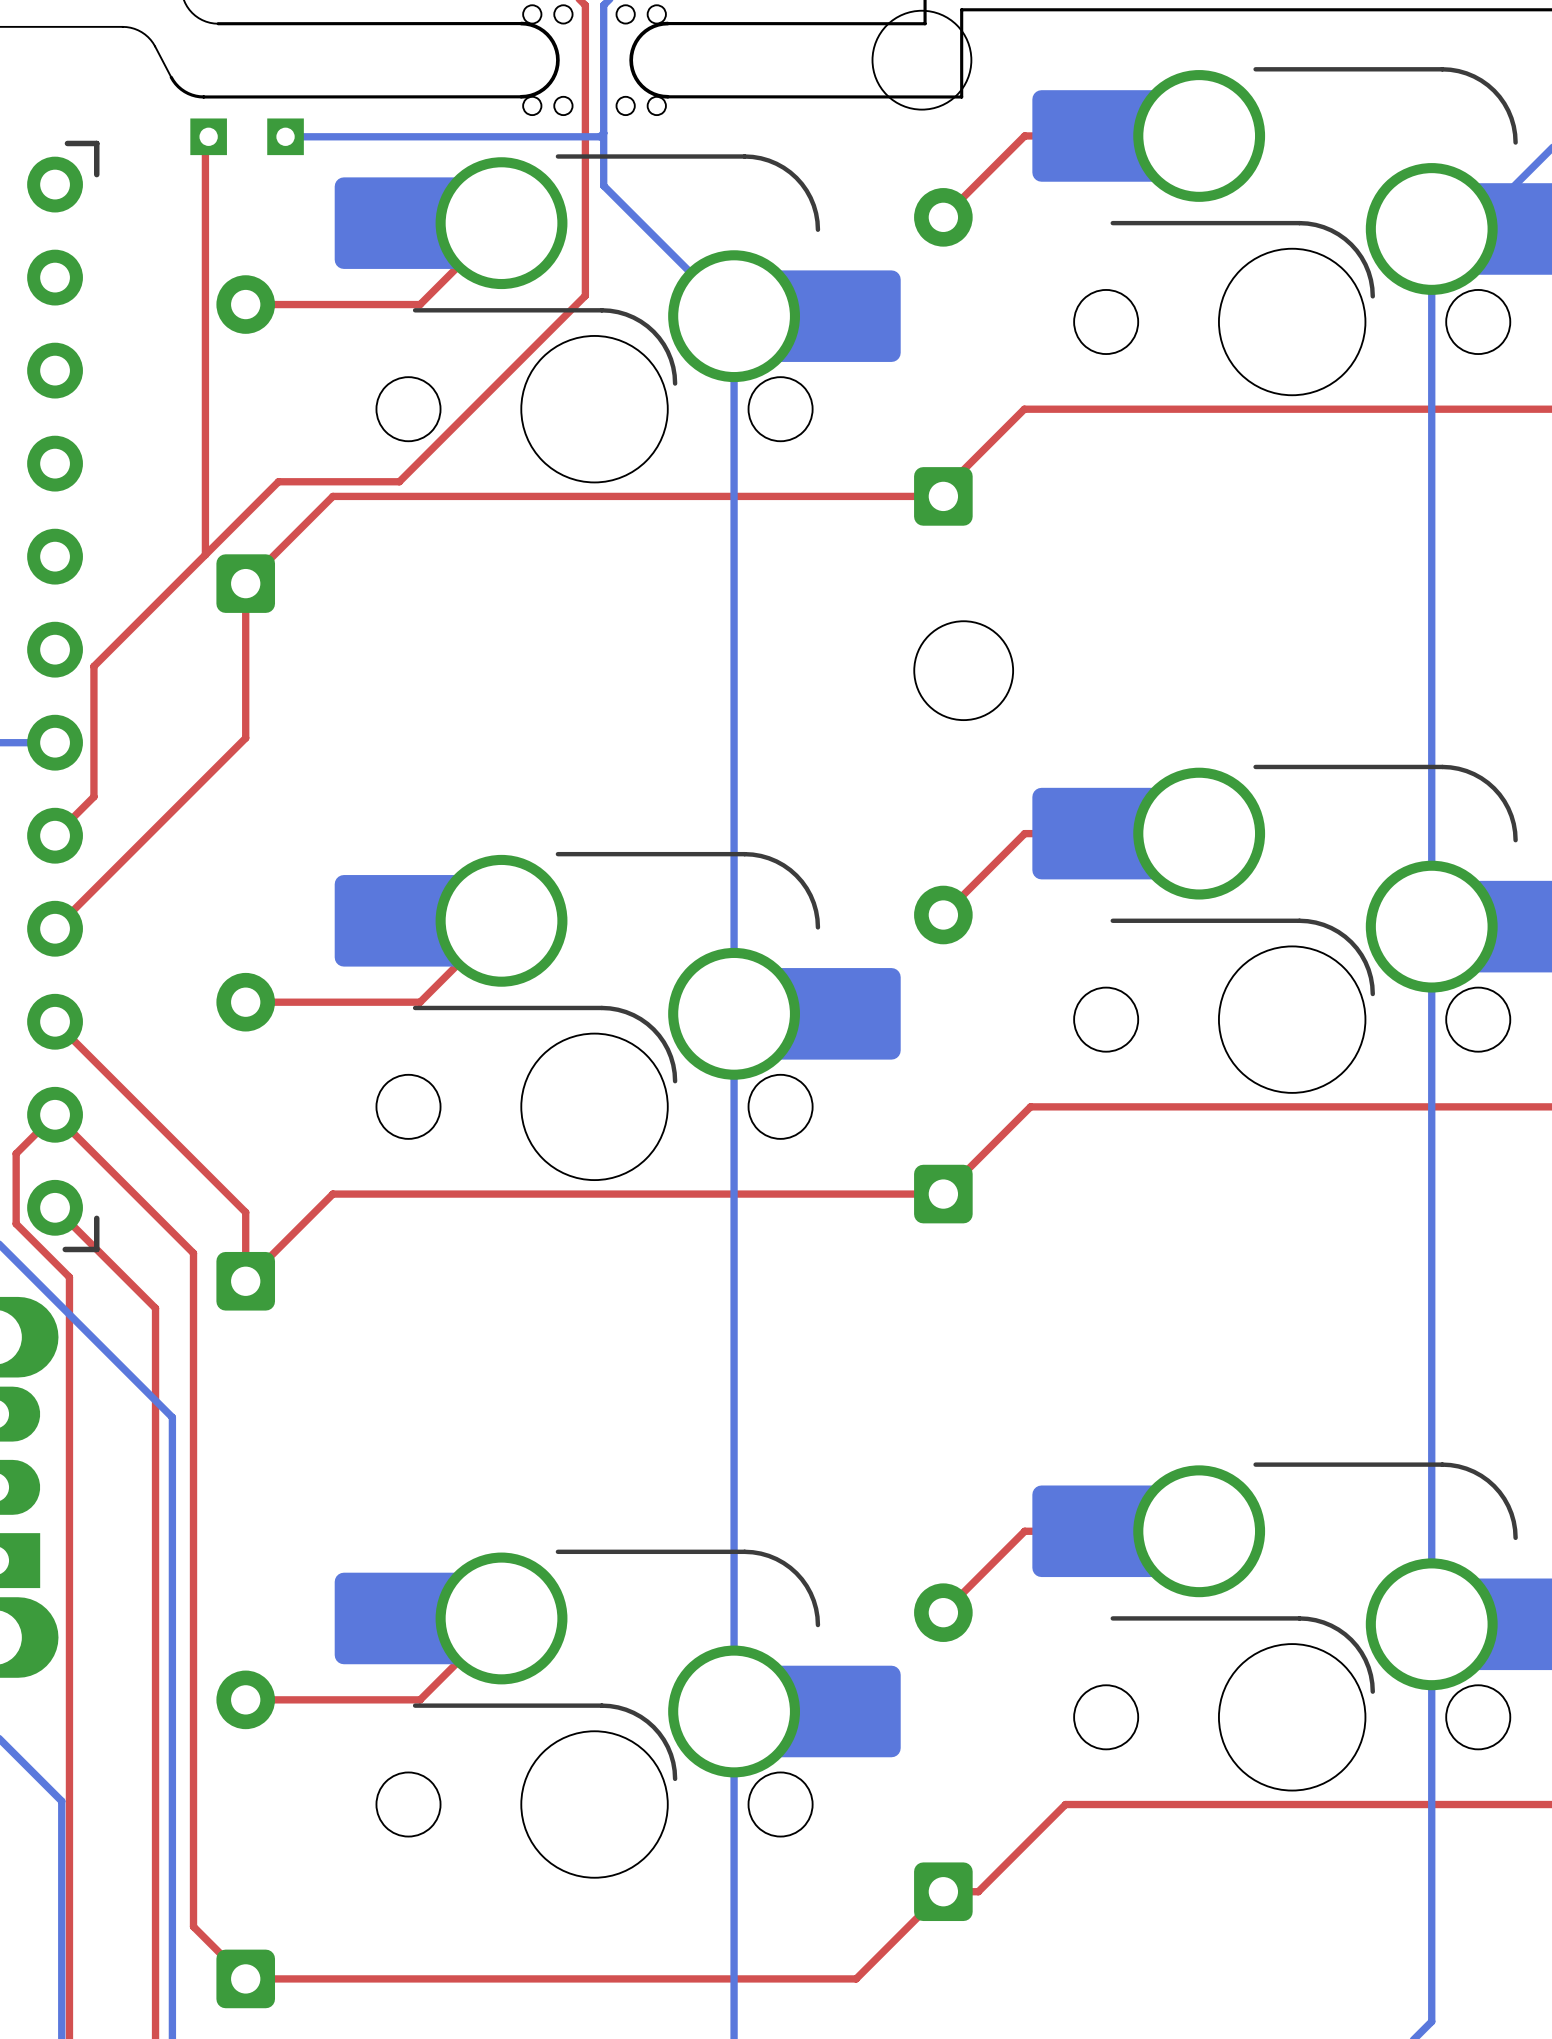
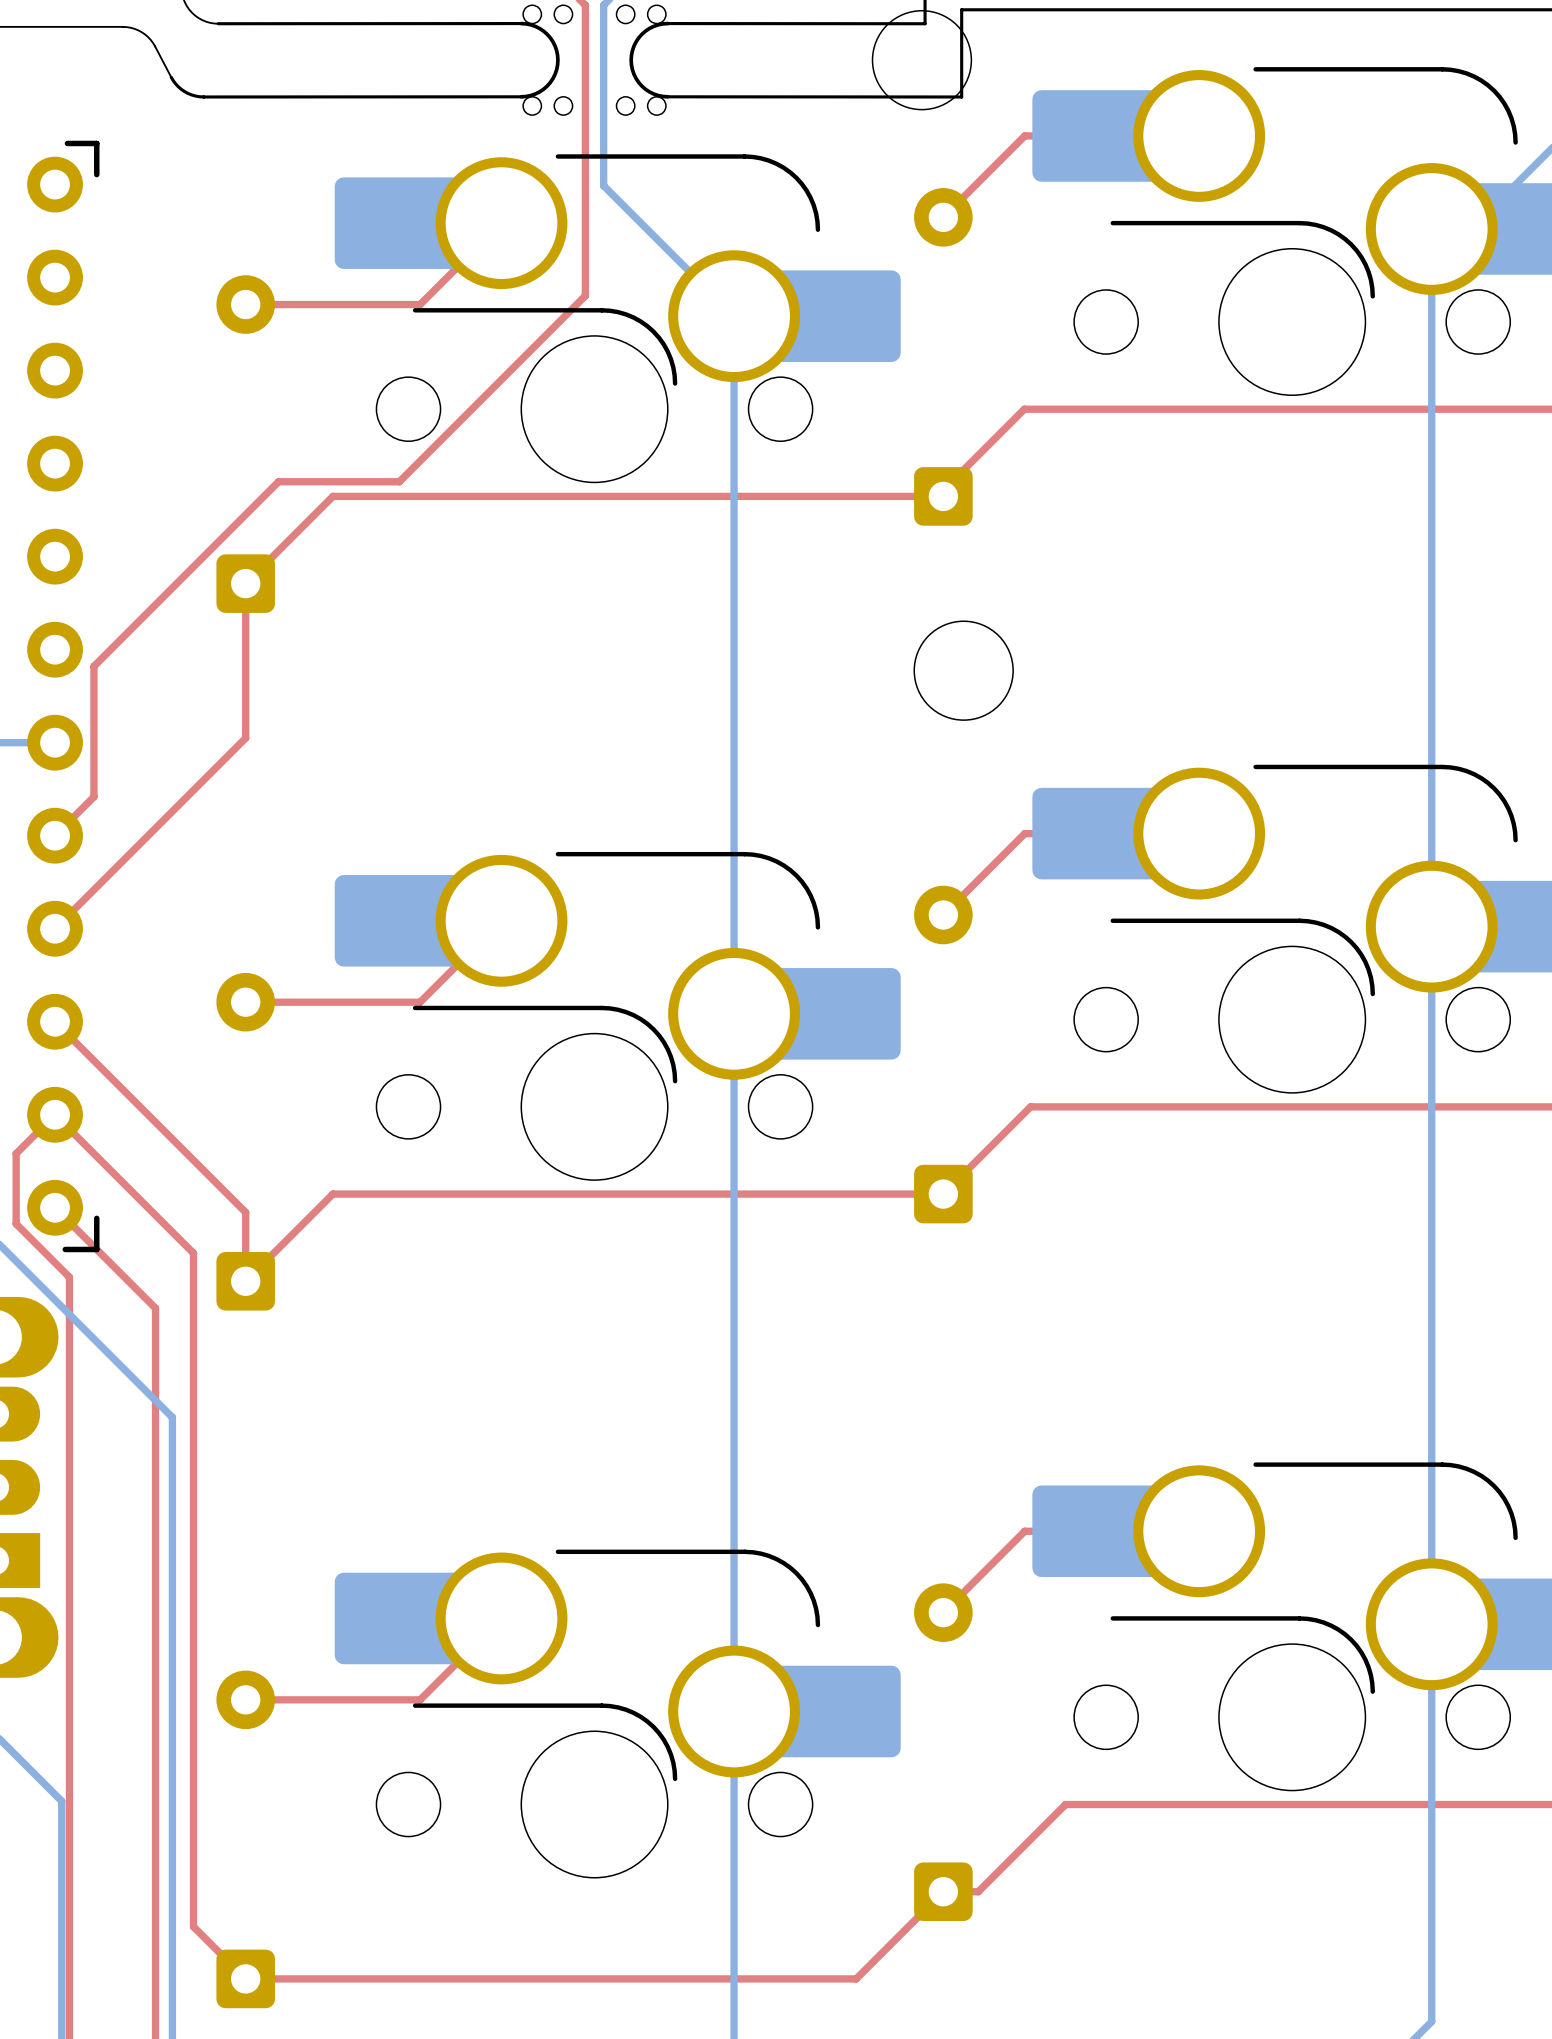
bottom track: (603, 133) (600, 136) (285, 136) -> none
top track: (208, 136) (205, 140) (205, 554) -> none
part: (208, 136) -> none
part: (285, 136) -> none

